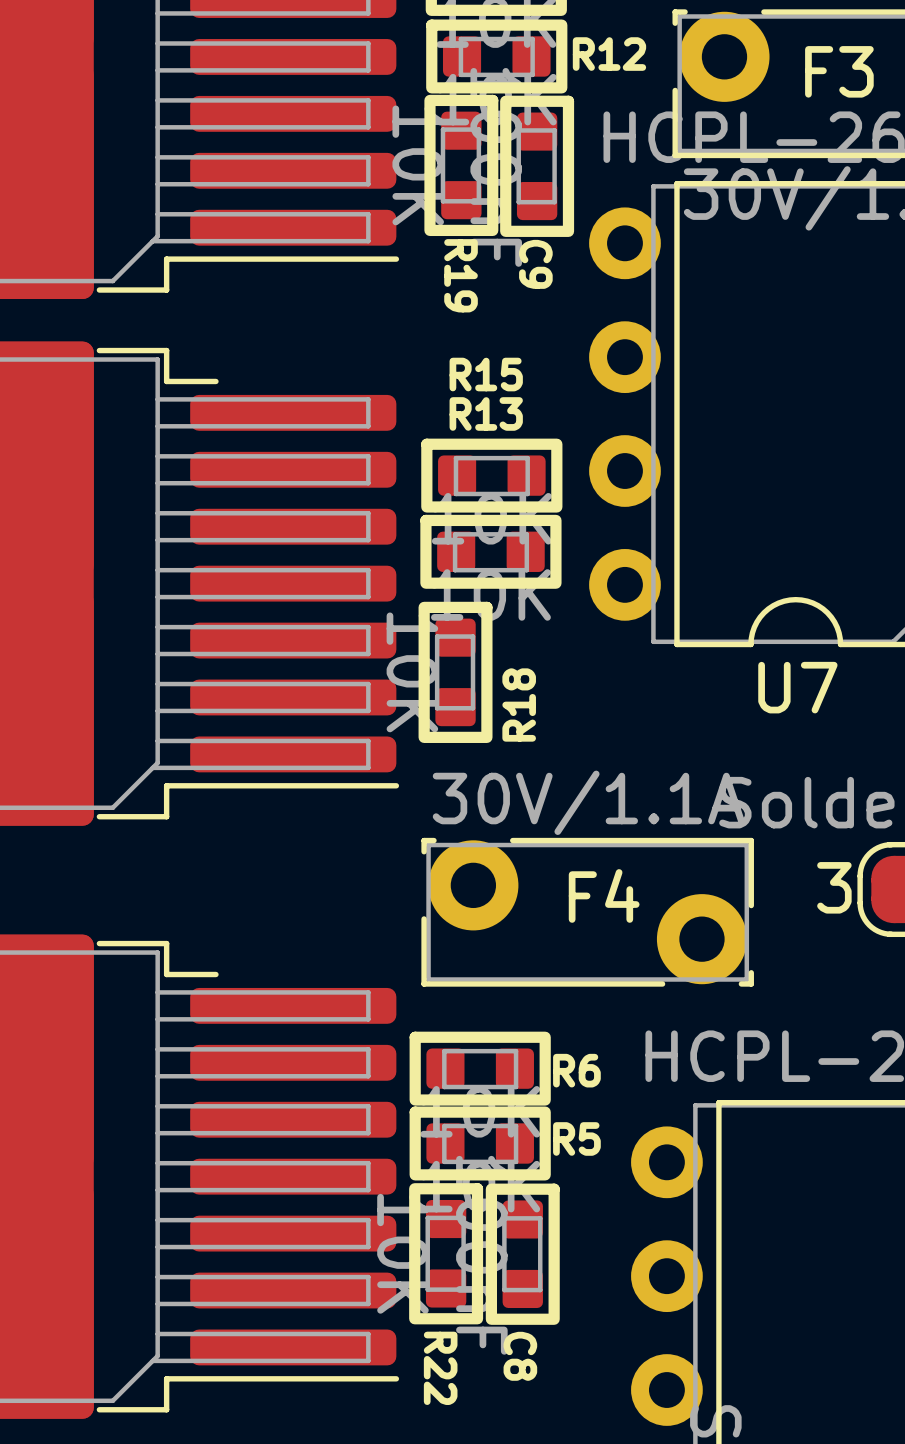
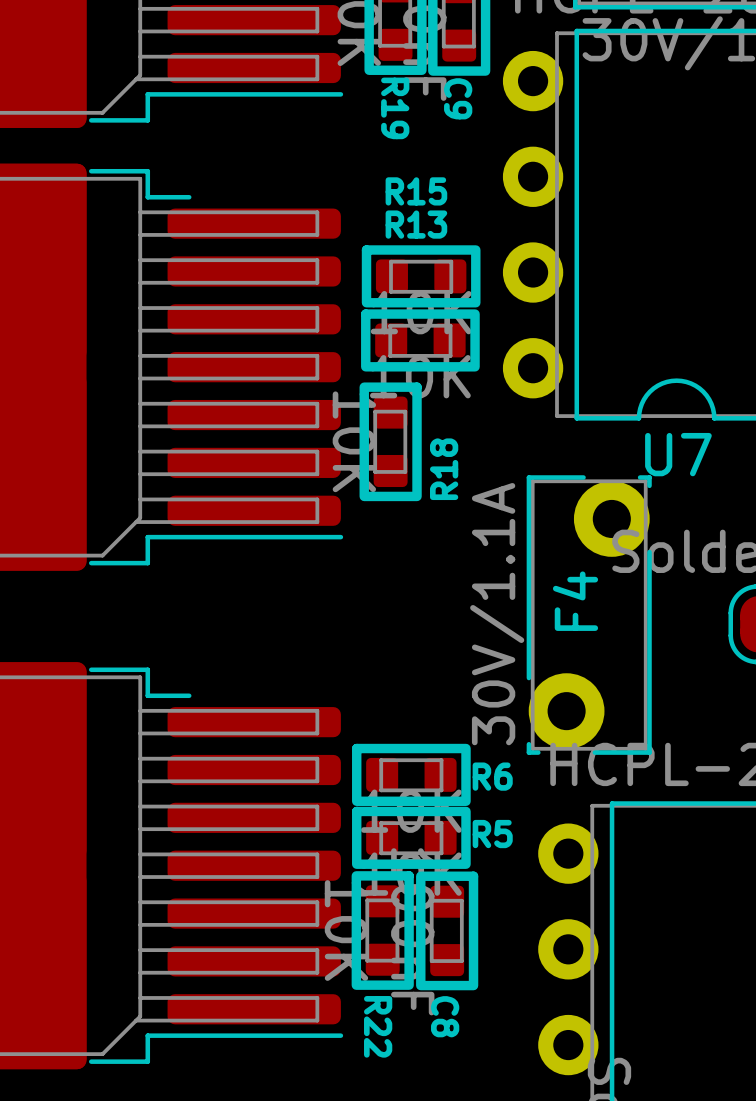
F4 value position: 30V/1.1A (588, 802) -> 30V/1.1A (497, 614)
part text: 3 (834, 887) -> none
F4 rotation: 0° (587, 912) -> 90° clockwise (589, 615)

